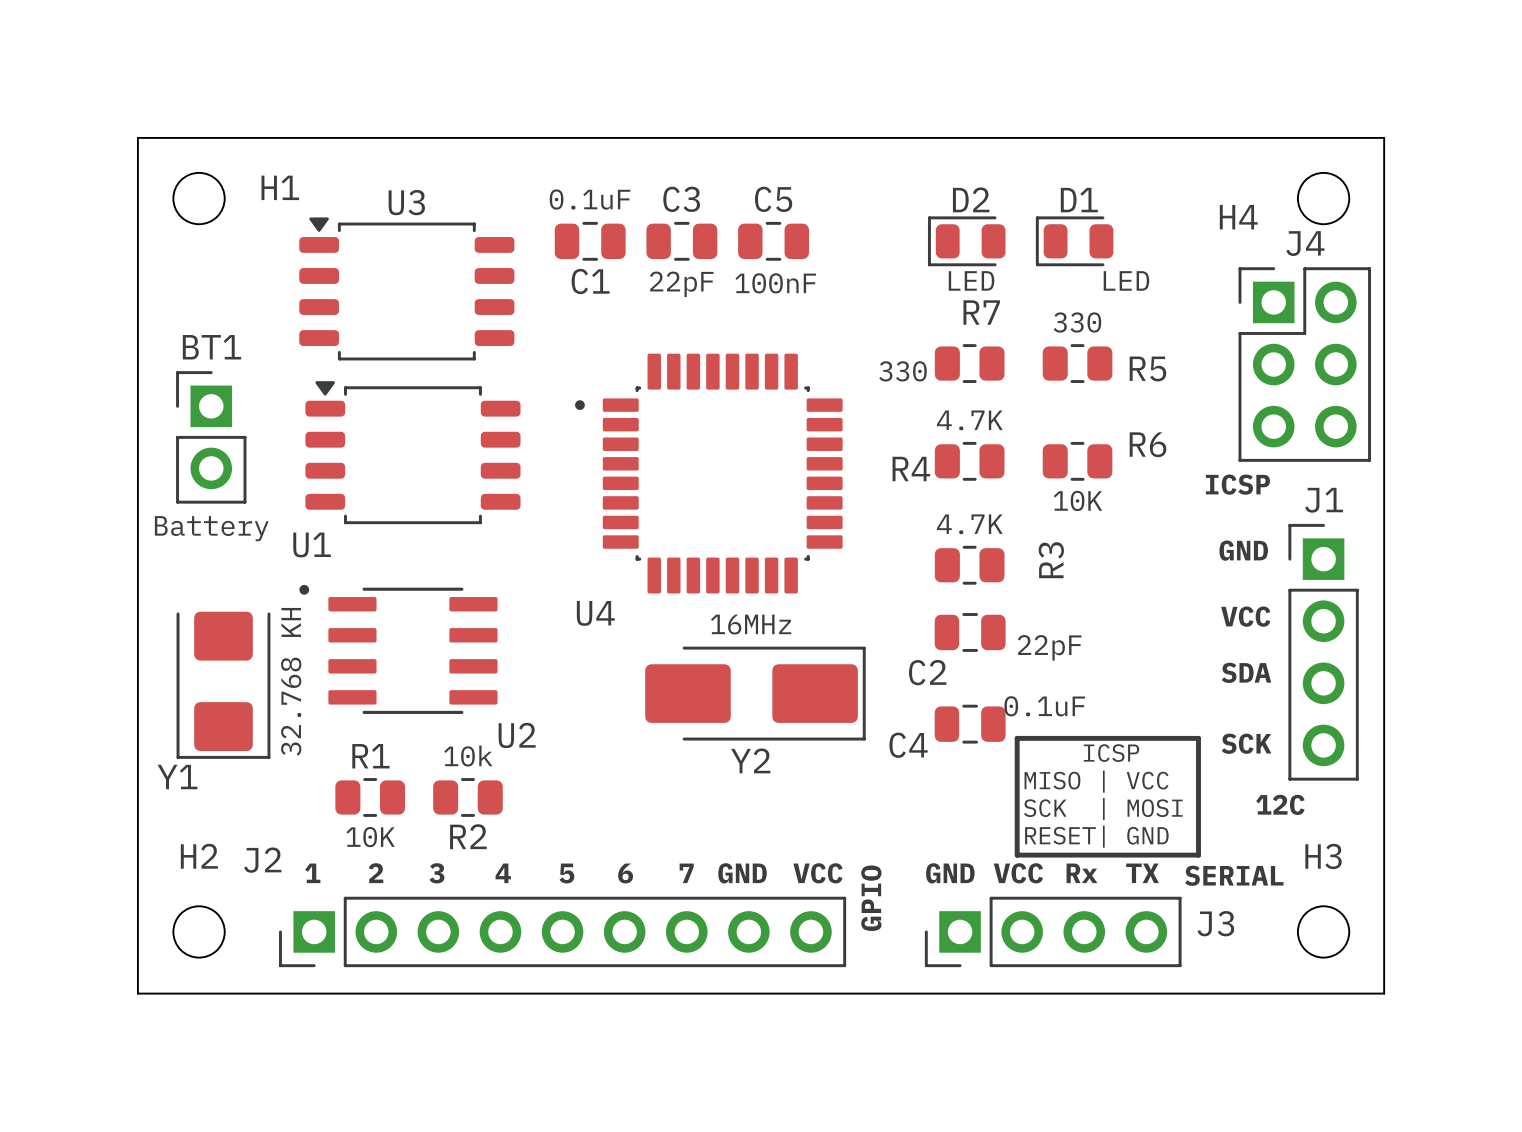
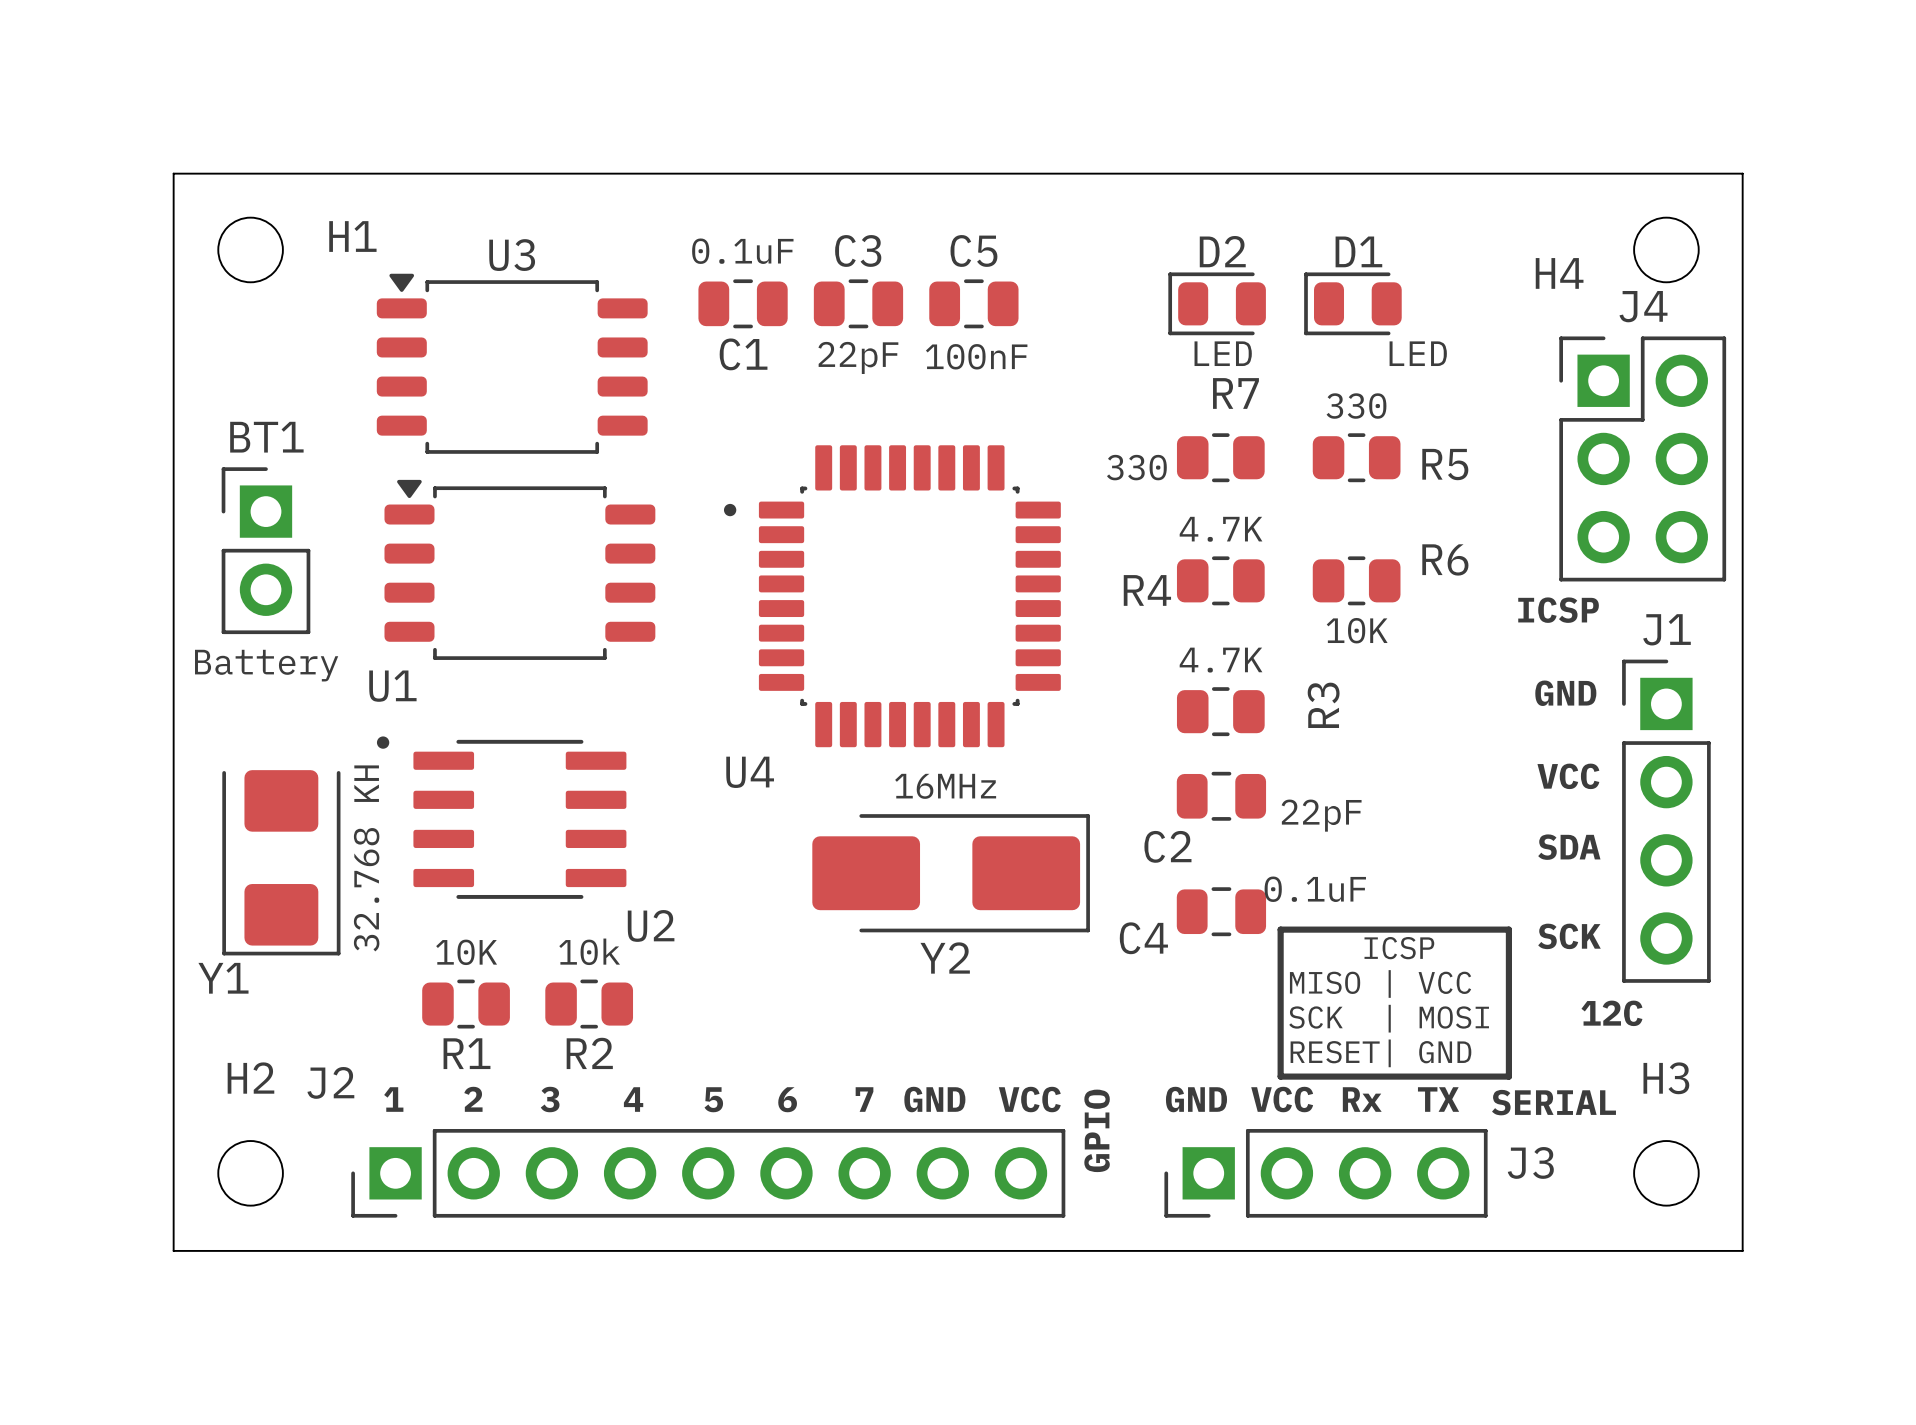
R1 name position: R1 (370, 756) -> R1 (467, 1053)
R1 value position: 10K (370, 837) -> 10K (466, 952)

